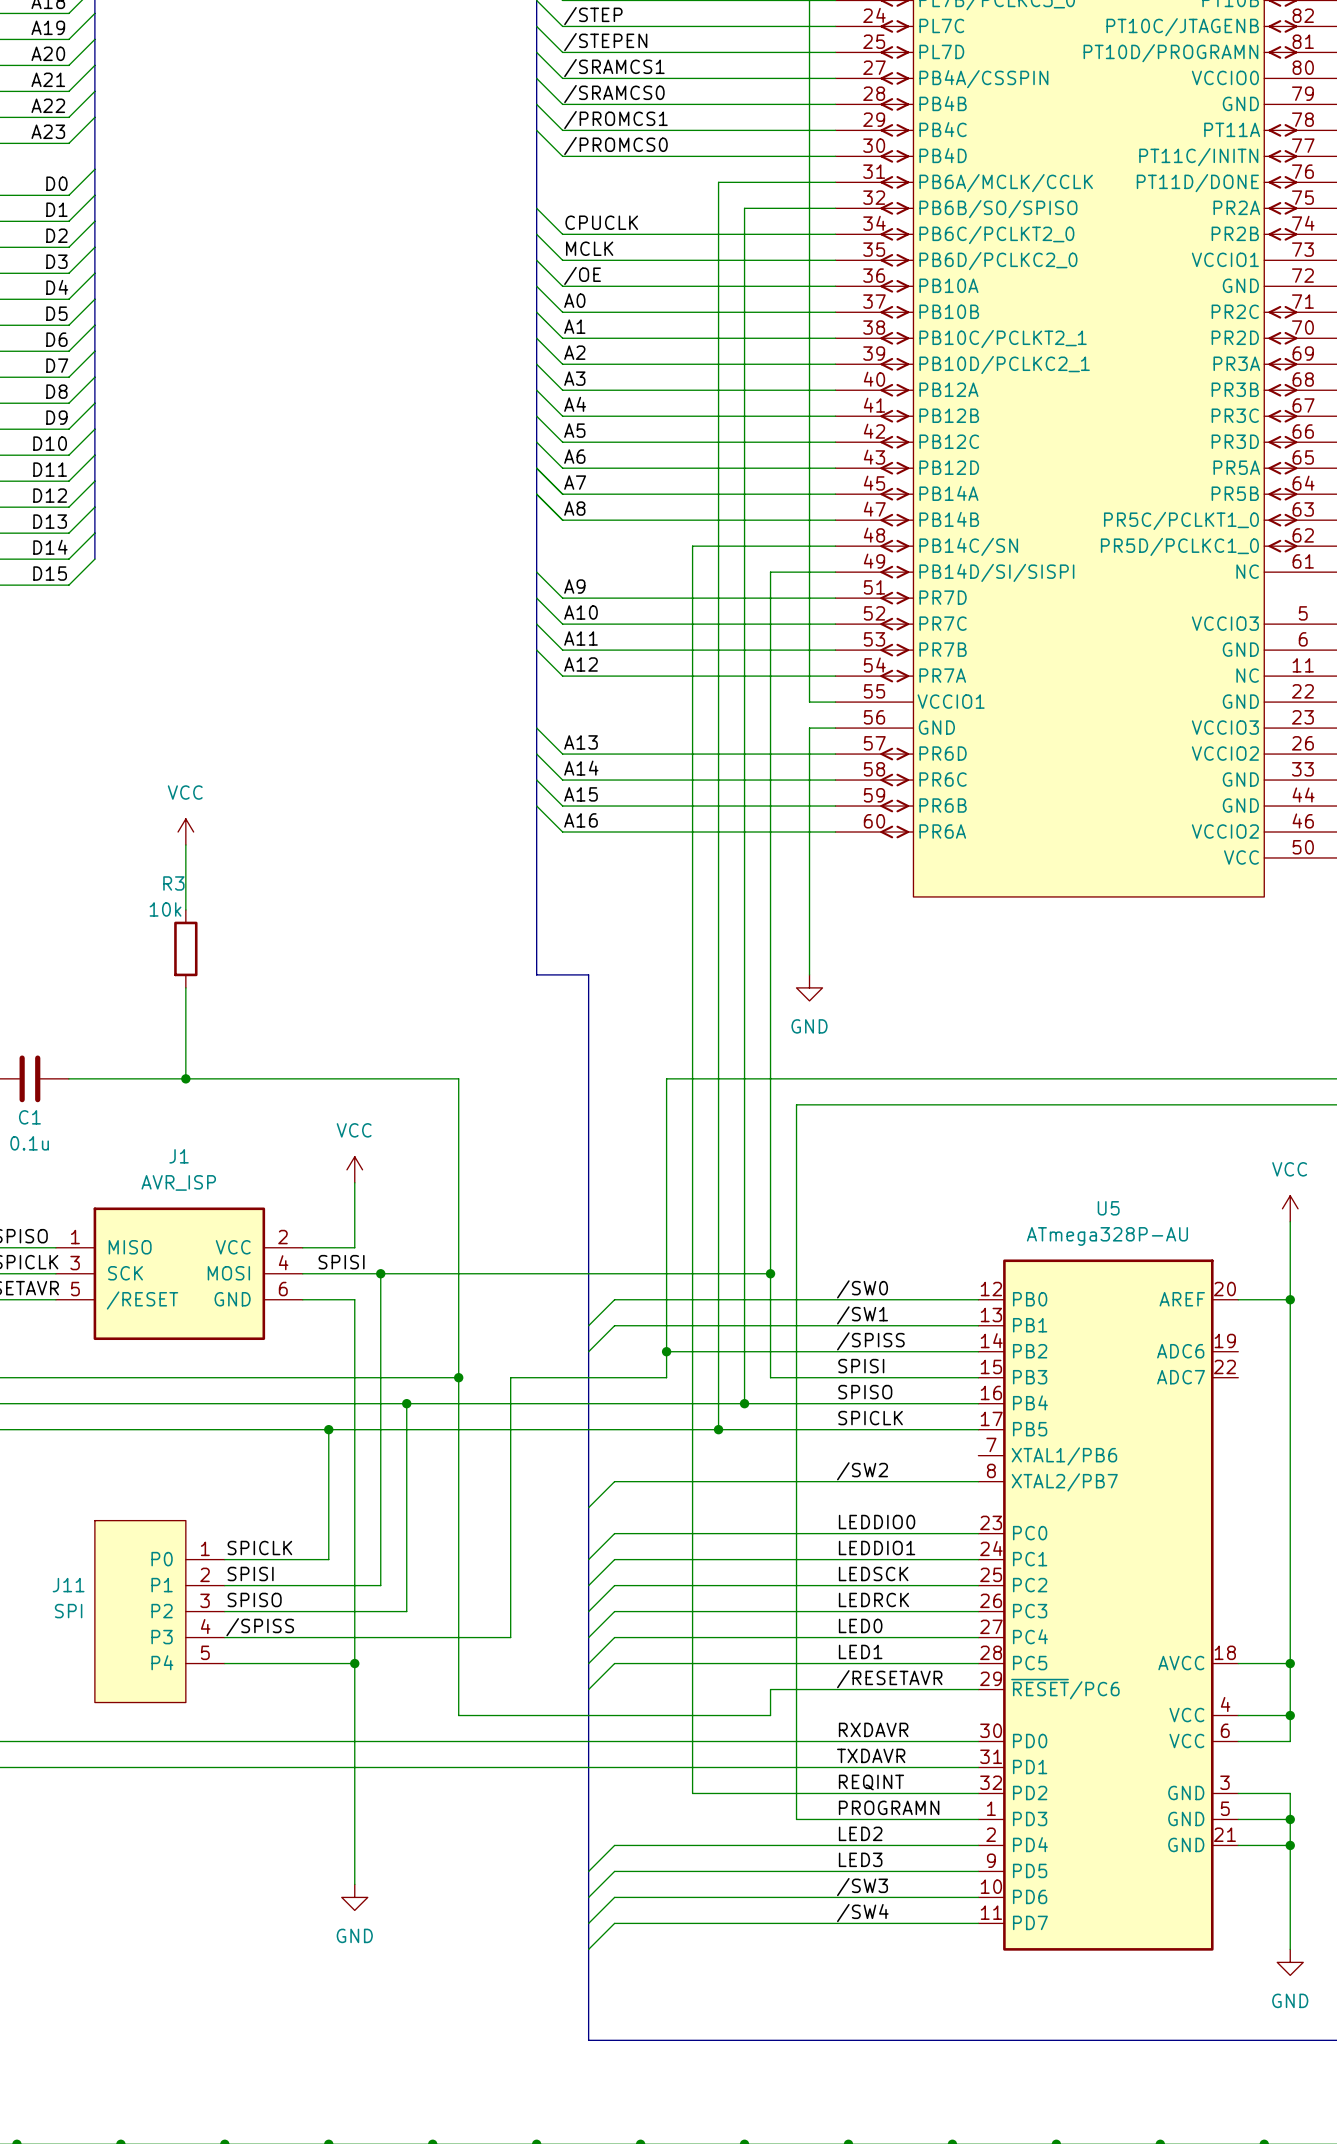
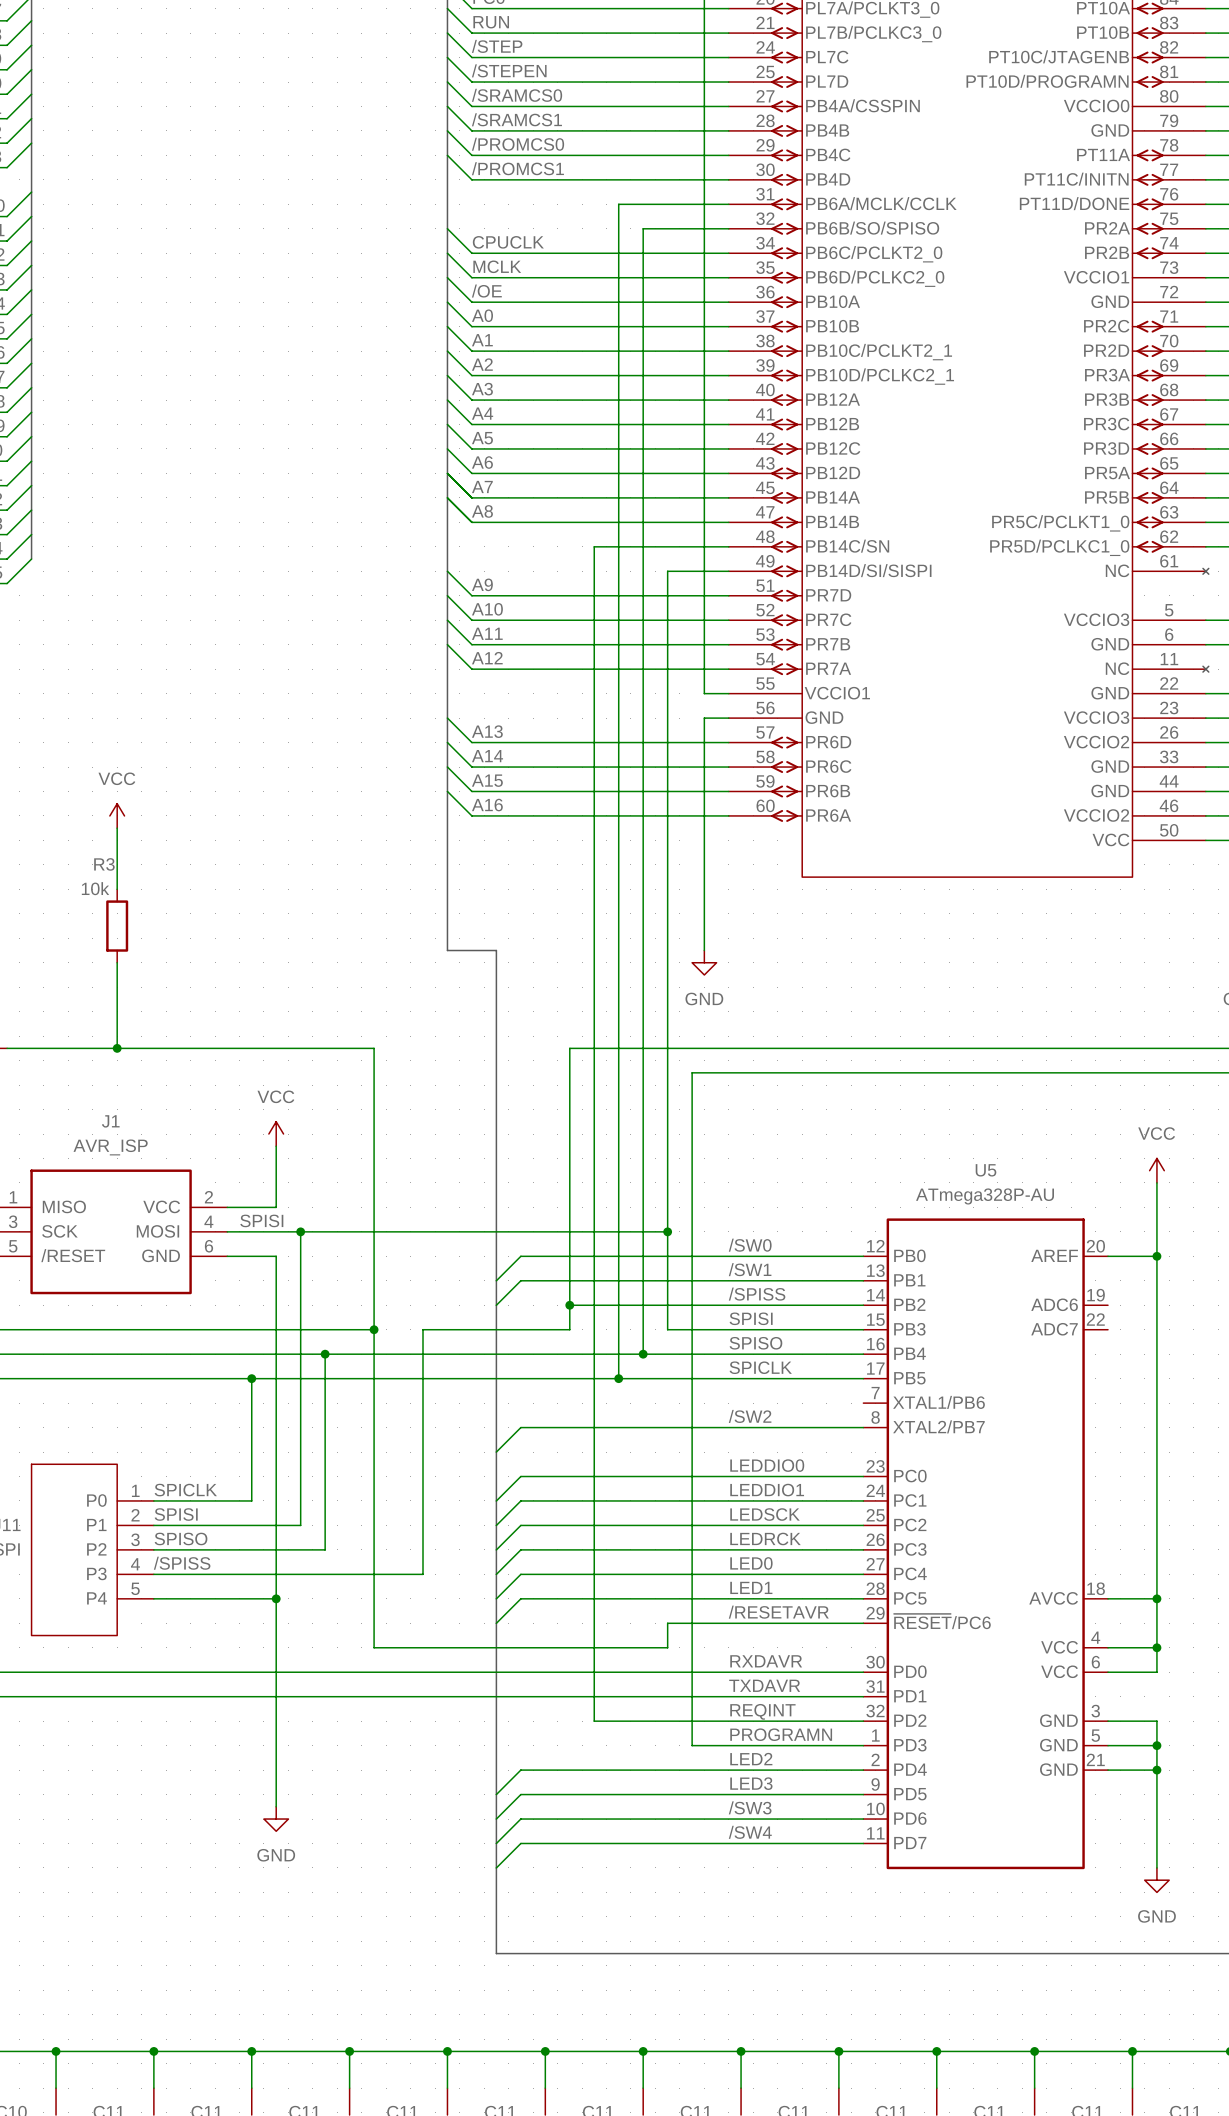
label: /SRAMCS1 (614, 68) -> /SRAMCS0 (517, 95)
label: /SRAMCS0 (614, 94) -> /SRAMCS1 (516, 119)
label: /PROMCS1 (615, 120) -> /PROMCS0 (518, 144)
label: /PROMCS0 (615, 146) -> /PROMCS1 (517, 168)

